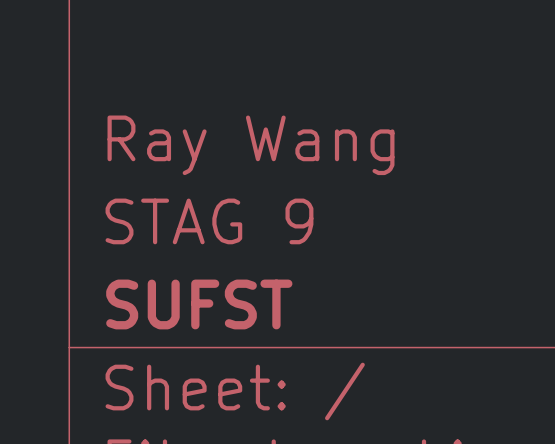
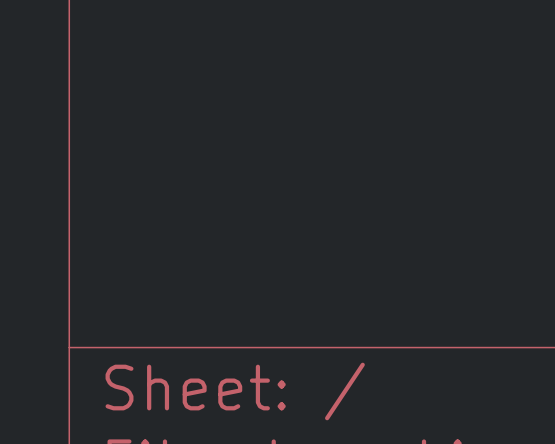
title block: Ray Wang (251, 145) -> none
title block: STAG 9 (209, 221) -> none
title block: SUFST (199, 304) -> none

